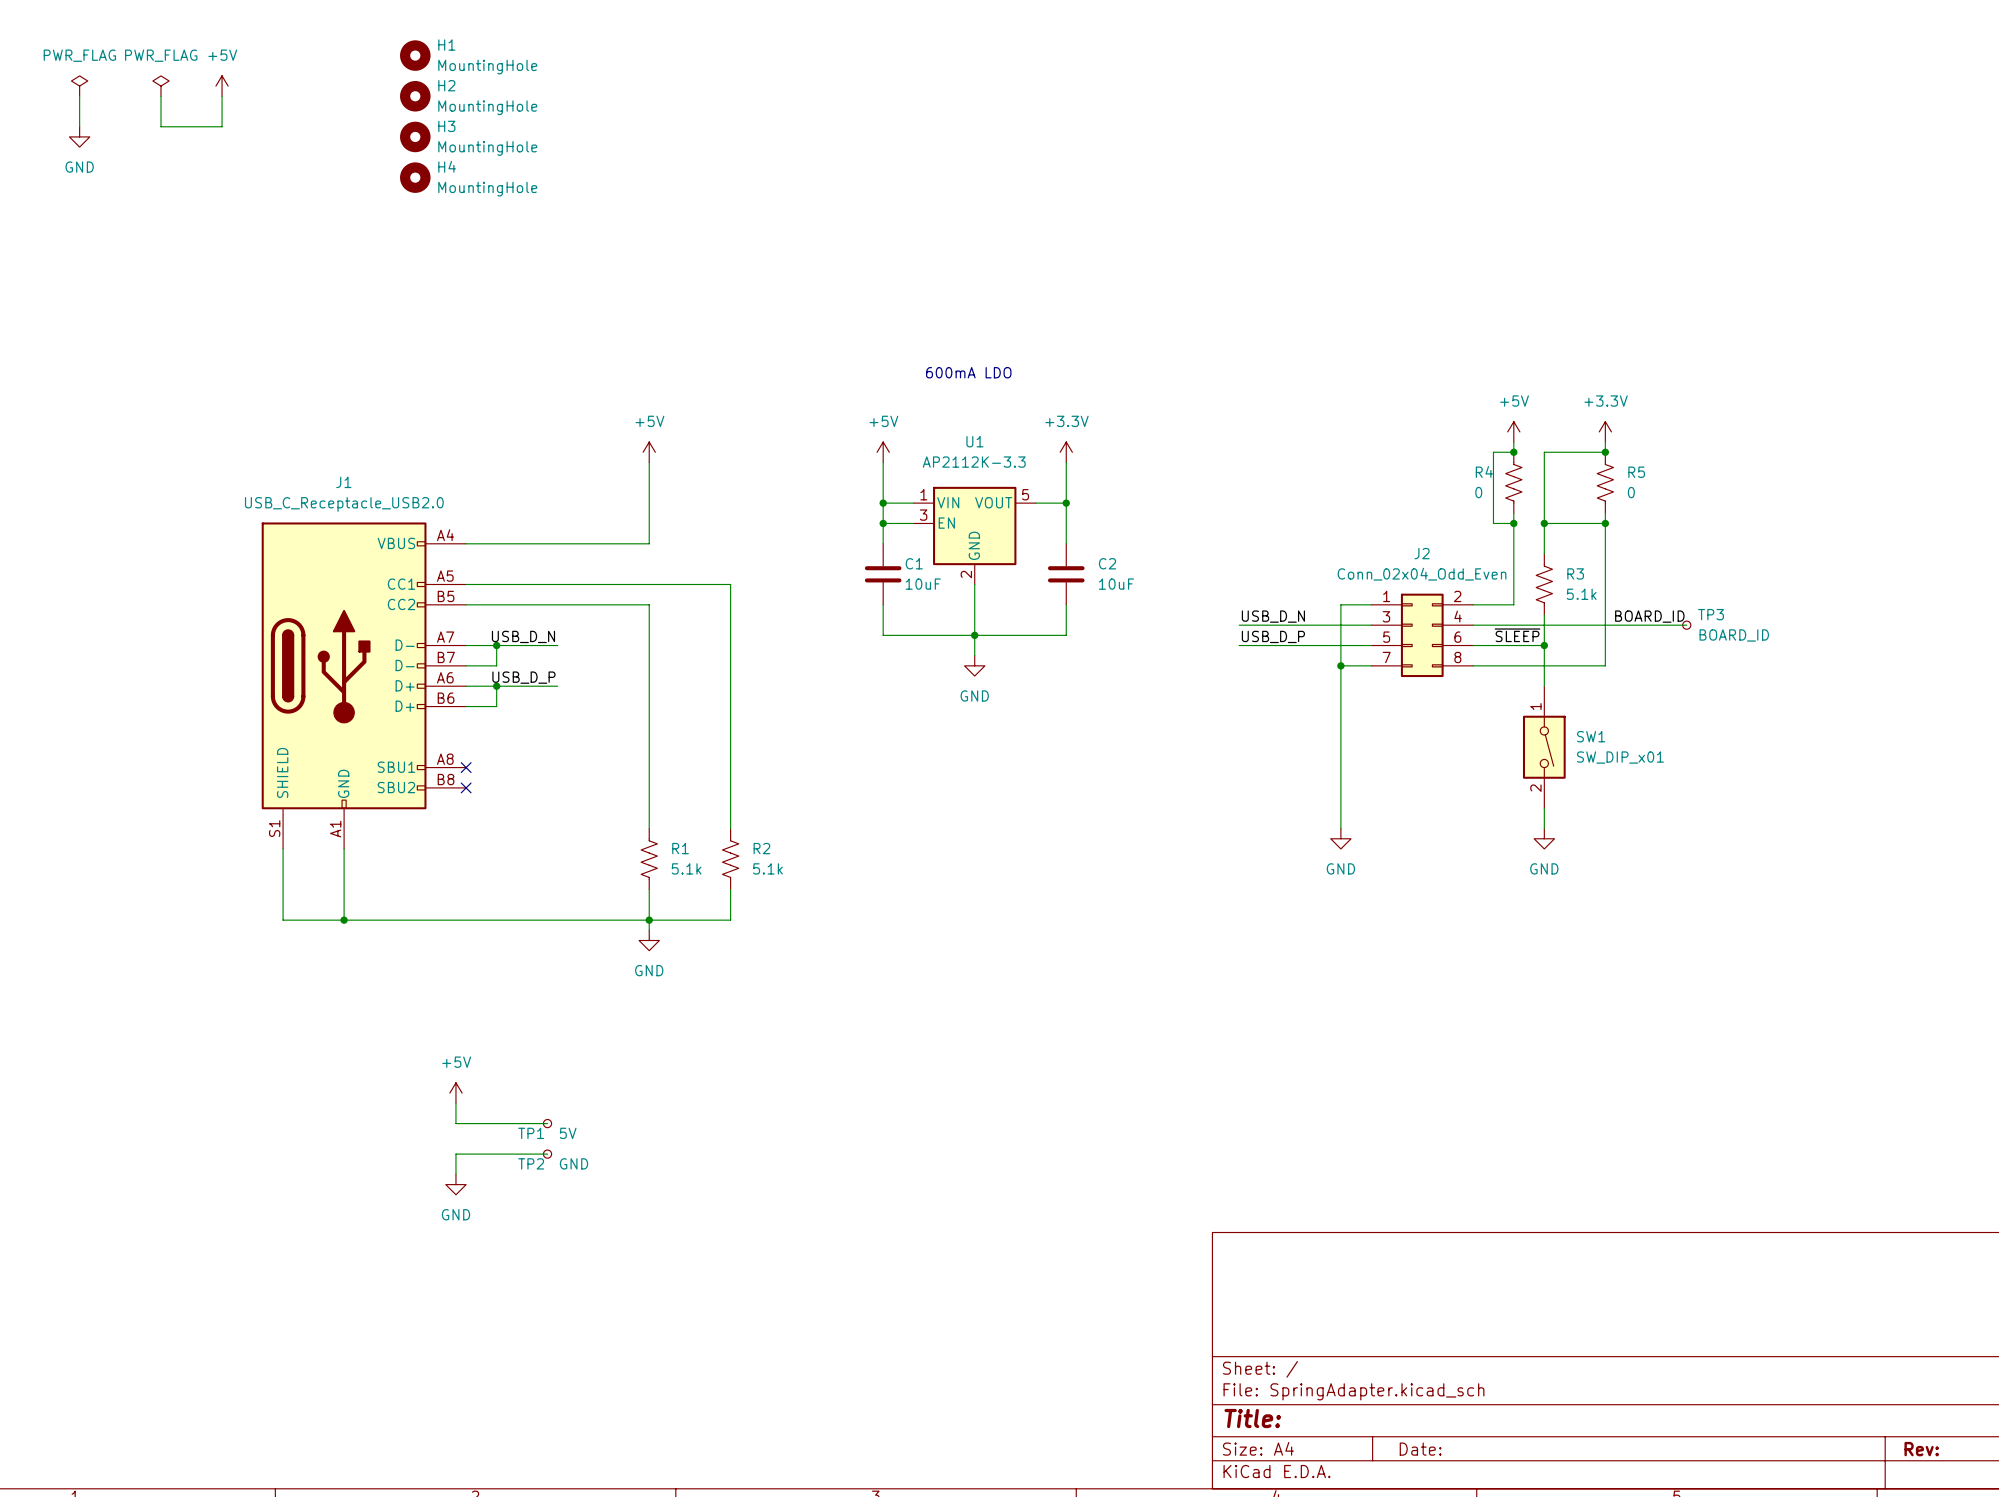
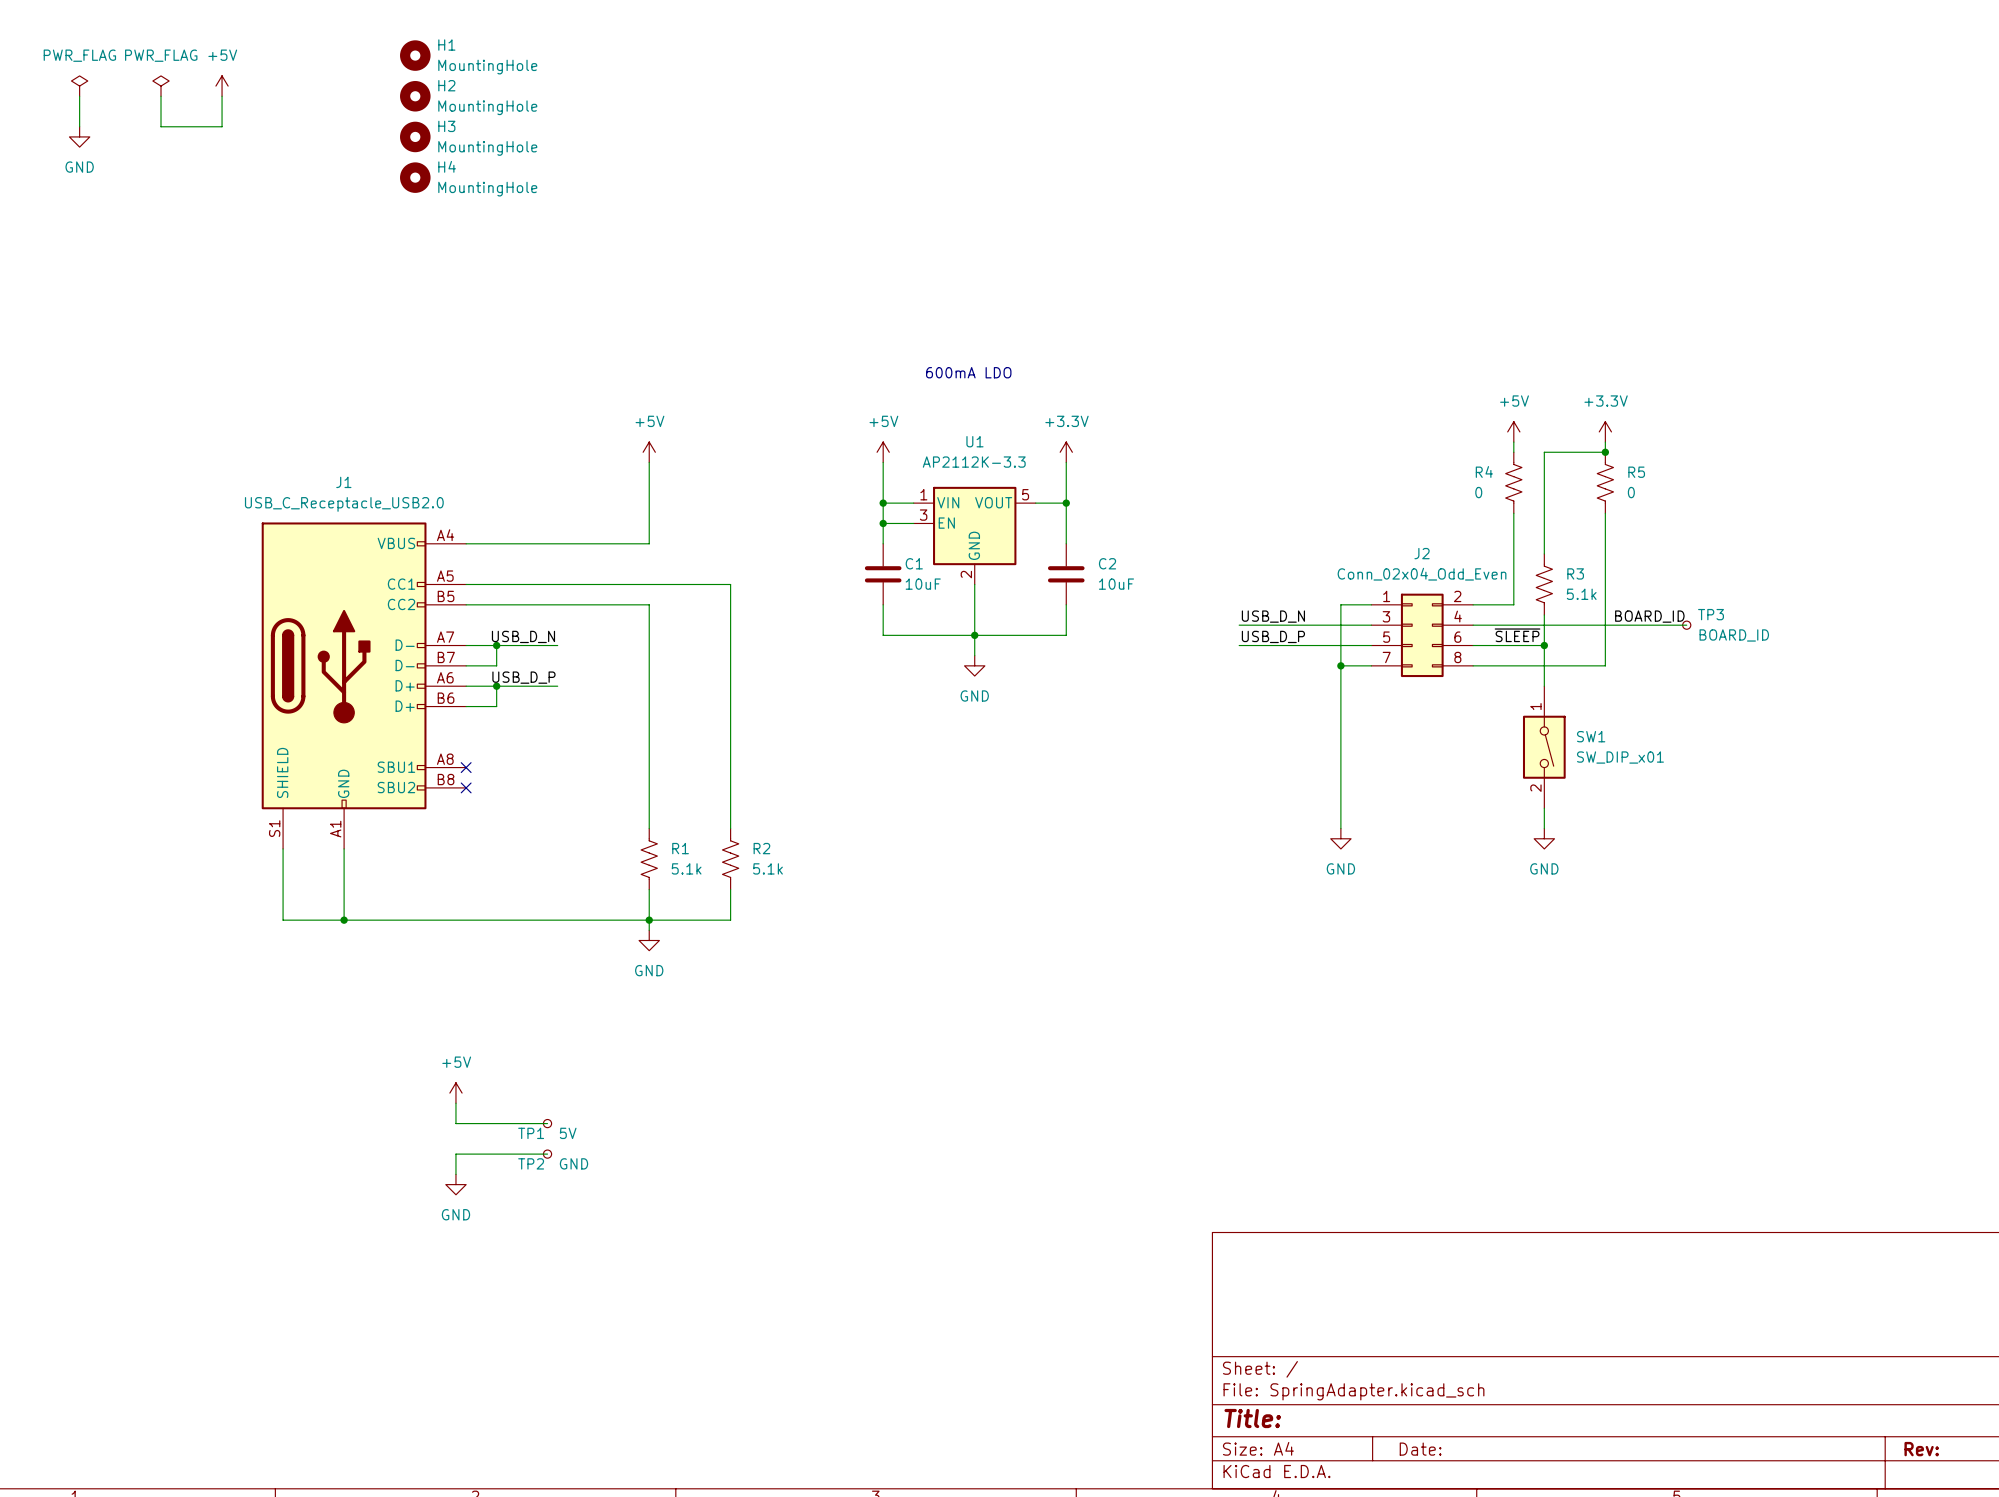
wire: (1513, 452) (1493, 452) (1493, 523) (1513, 523) -> none
junction: (1513, 452) -> none
junction: (1513, 523) -> none
wire: (1544, 523) (1605, 523) -> none
junction: (1544, 523) -> none
junction: (1605, 523) -> none

